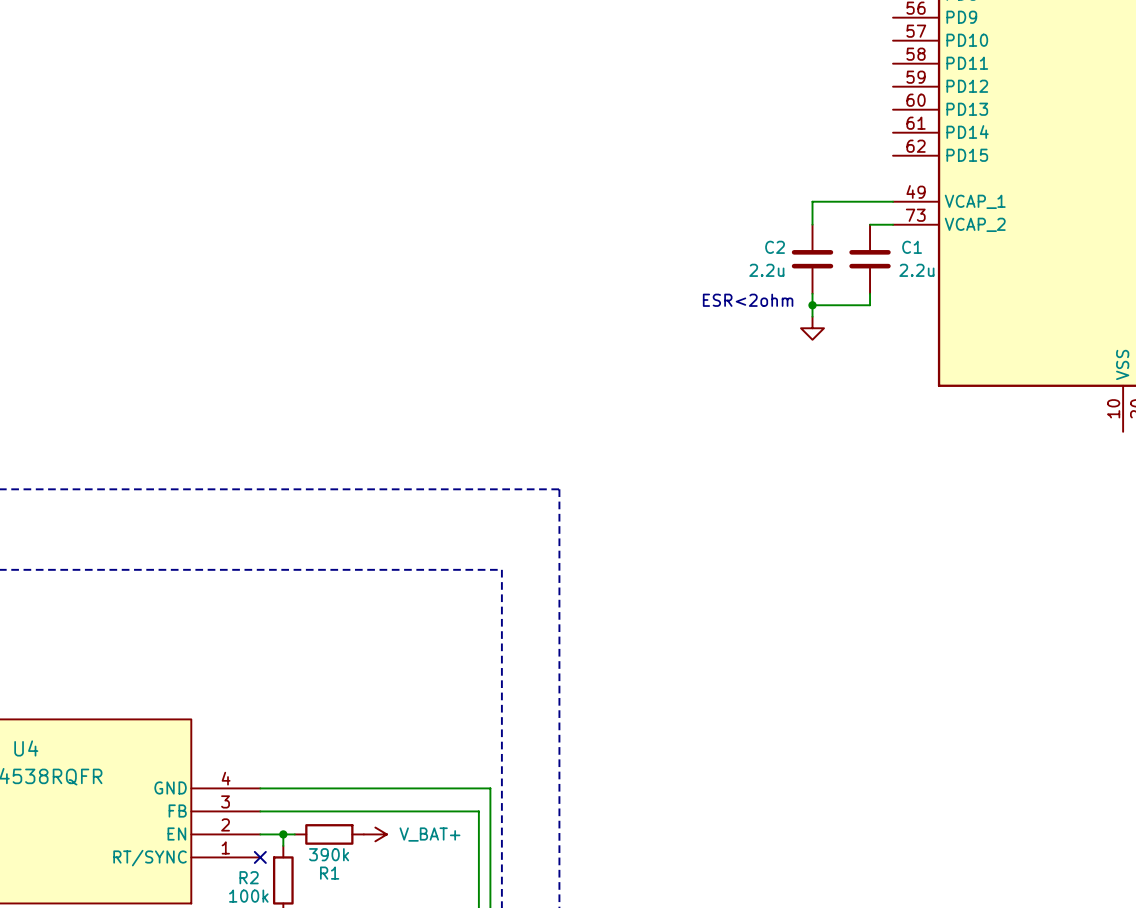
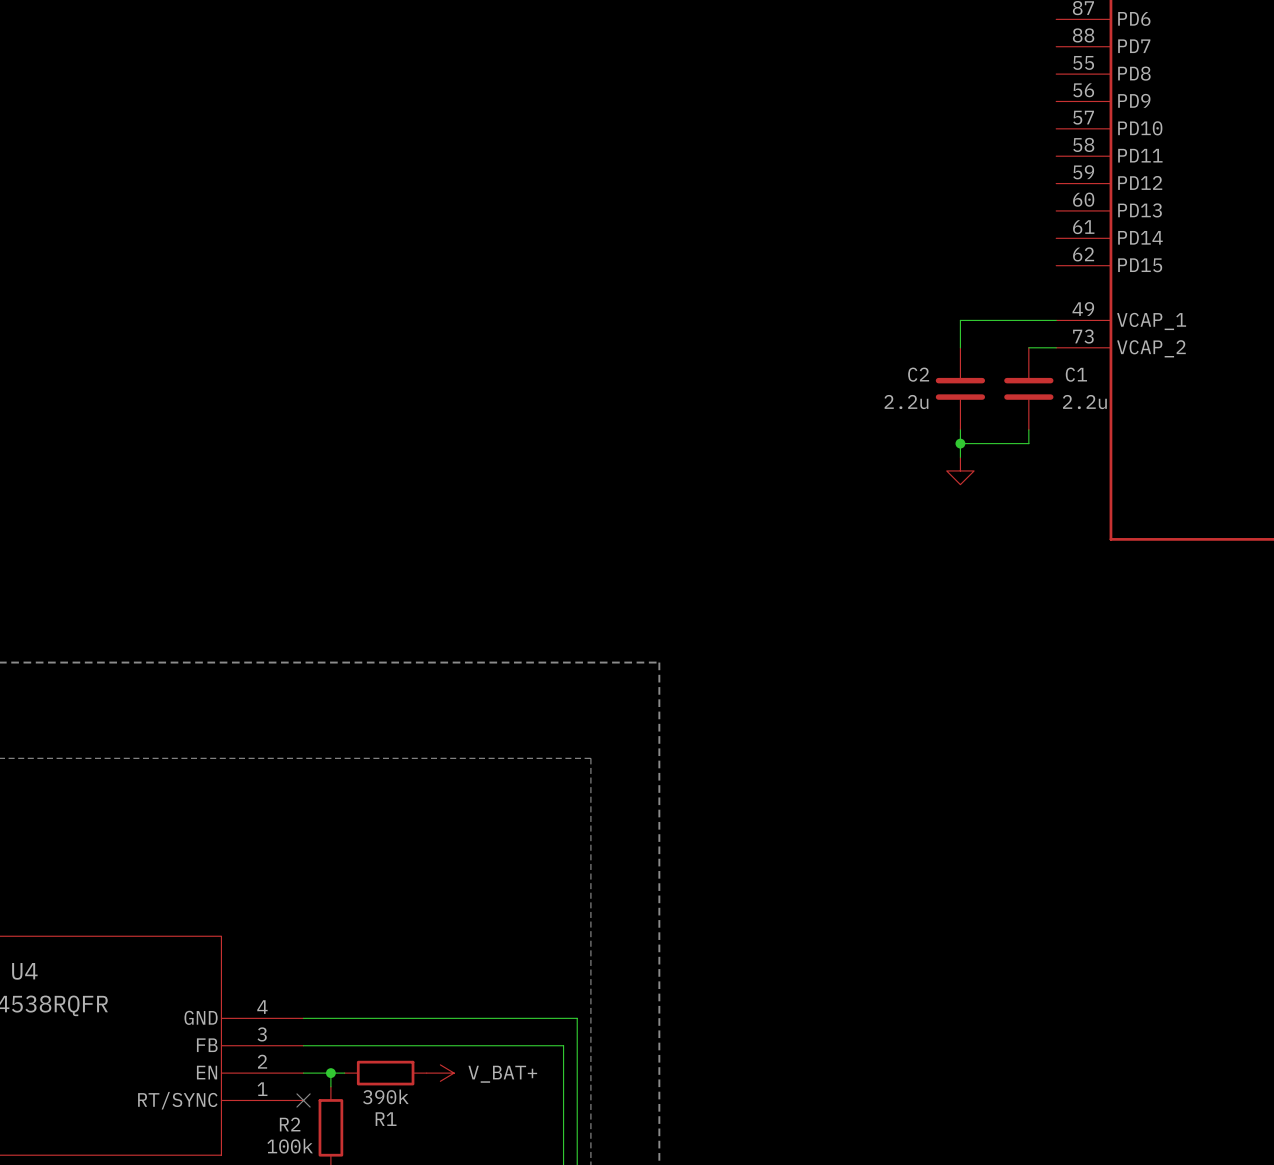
text: ESR<2ohm (748, 300) -> none

